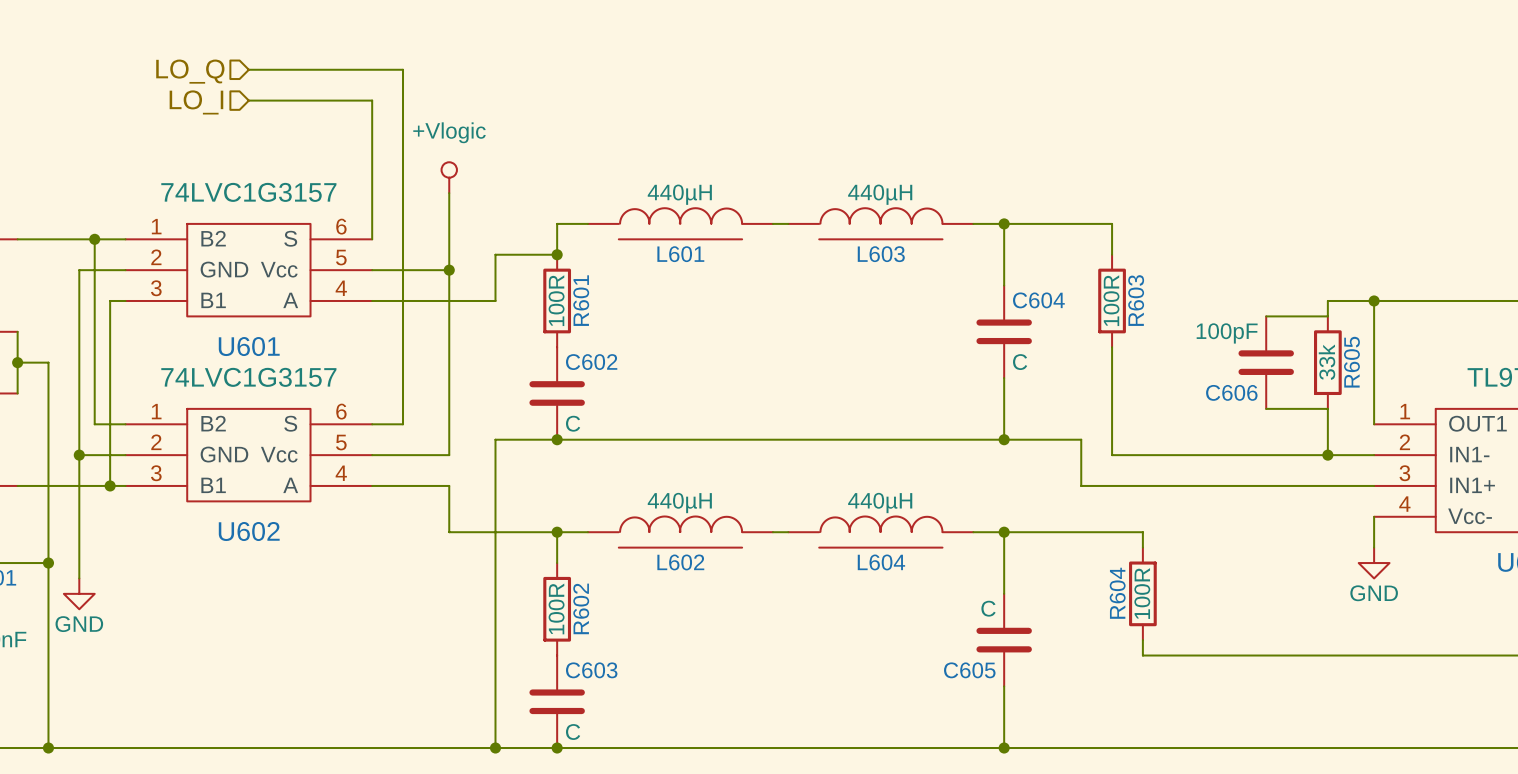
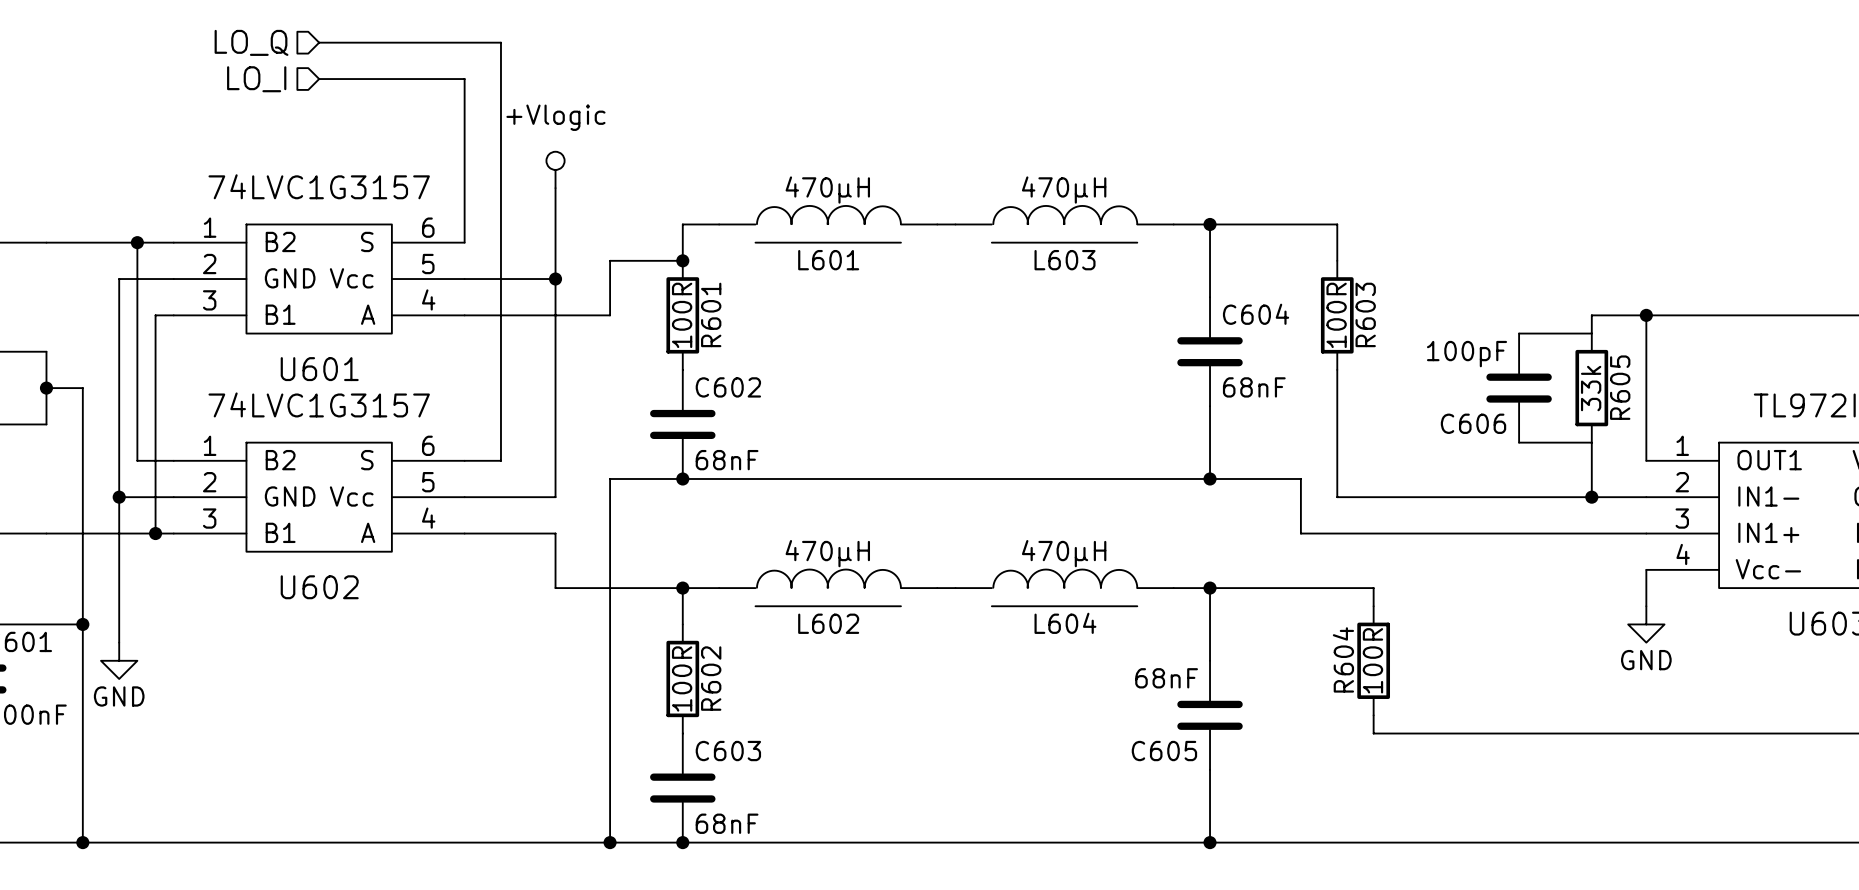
L601 value: 440µH (679, 194) -> 470µH (827, 190)
L603 value: 440µH (880, 194) -> 470µH (1064, 190)
C604 value: C (1020, 362) -> 68nF (1254, 387)
C602 value: C (573, 423) -> 68nF (727, 460)
L602 value: 440µH (679, 503) -> 470µH (827, 553)
L604 value: 440µH (880, 503) -> 470µH (1064, 553)
C605 value: C (988, 608) -> 68nF (1166, 678)
C603 value: C (573, 732) -> 68nF (727, 823)

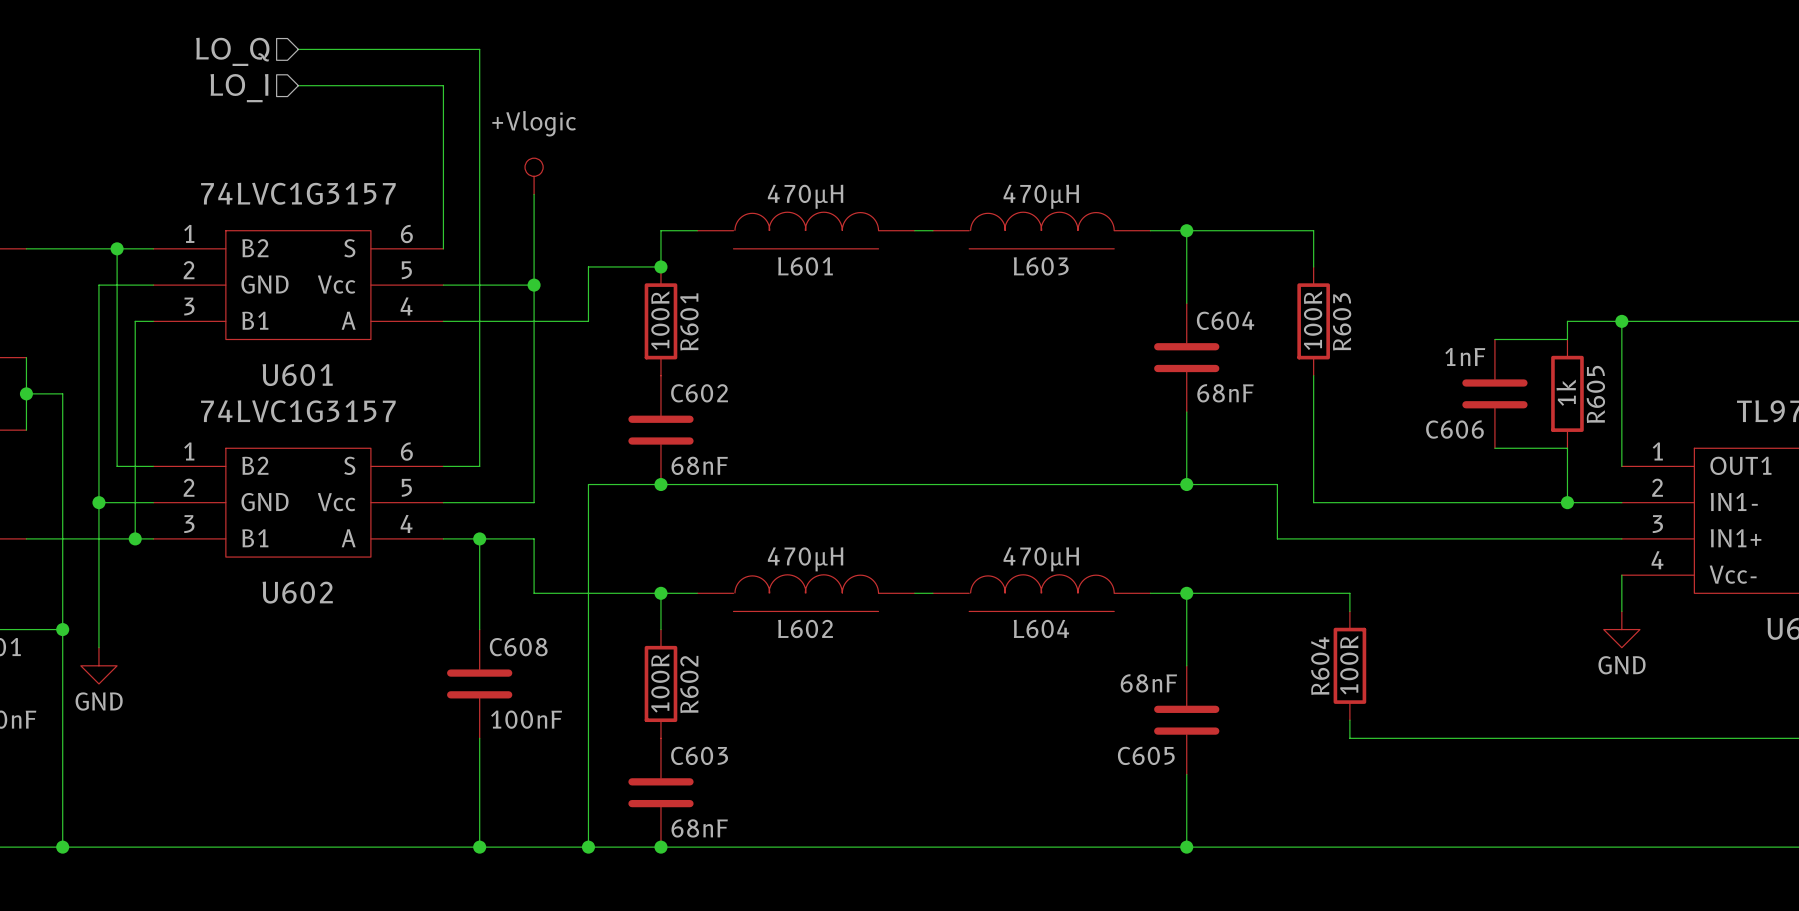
C606 value: 100pF (1467, 354) -> 1nF (1465, 356)
R605 value: 33k (1591, 388) -> 1k (1566, 392)
wire: none -> (479, 538) (479, 629)
junction: none -> (479, 538)
C608: none -> 100nF (479, 683)
wire: none -> (479, 738) (479, 847)
junction: none -> (479, 847)

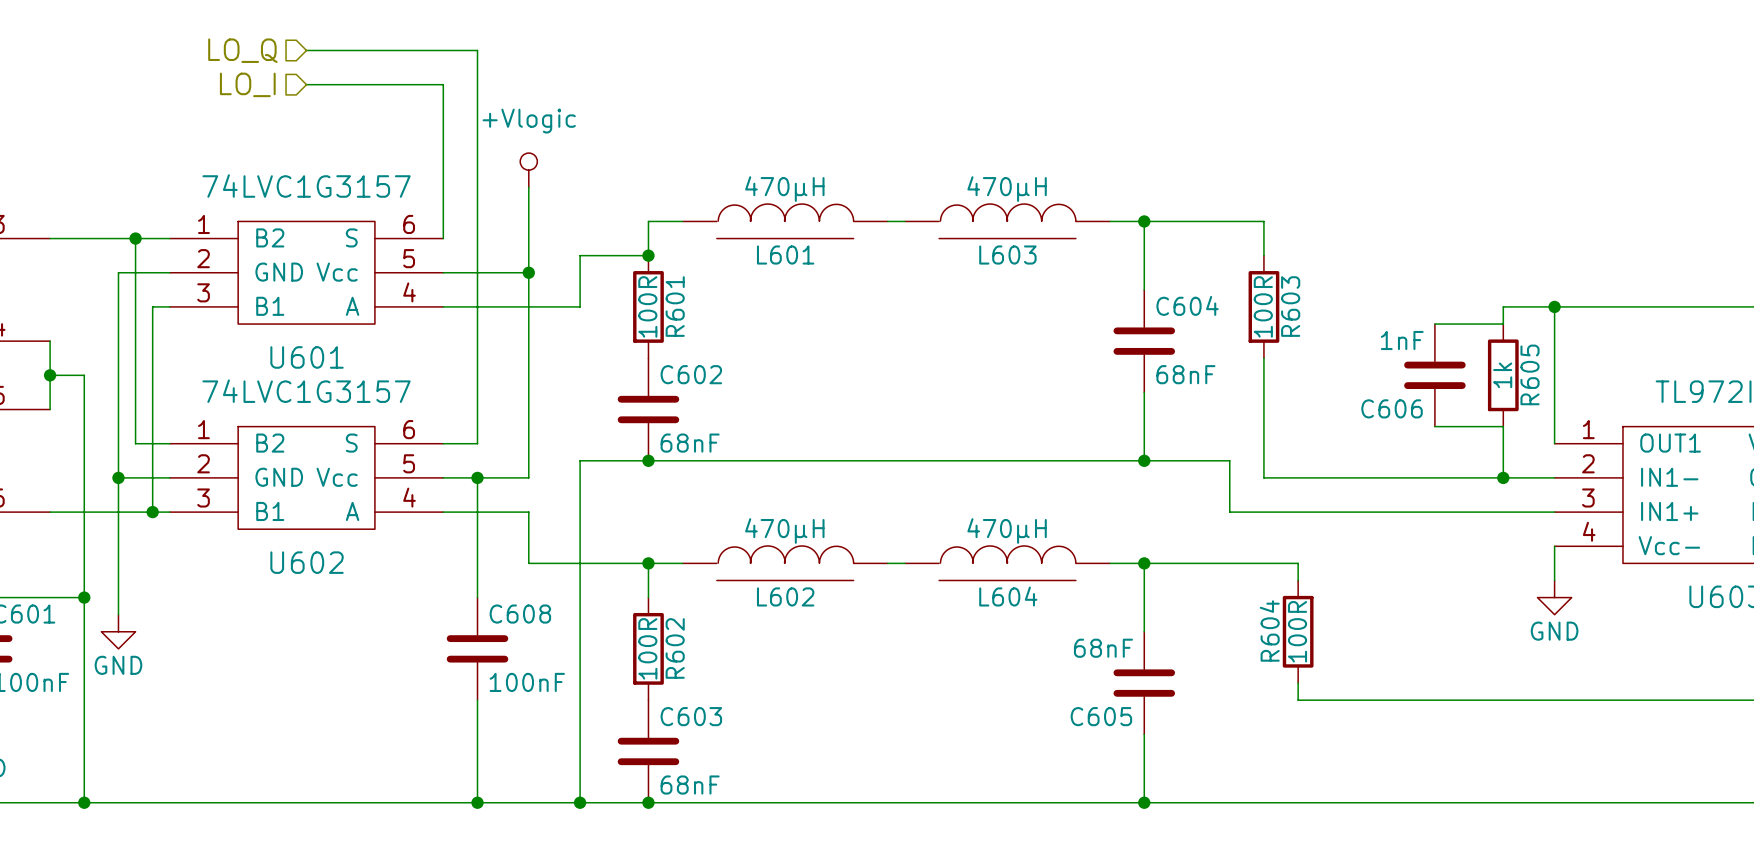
wire: none -> (477, 477) (477, 512)
junction position: (479, 538) -> (477, 477)

